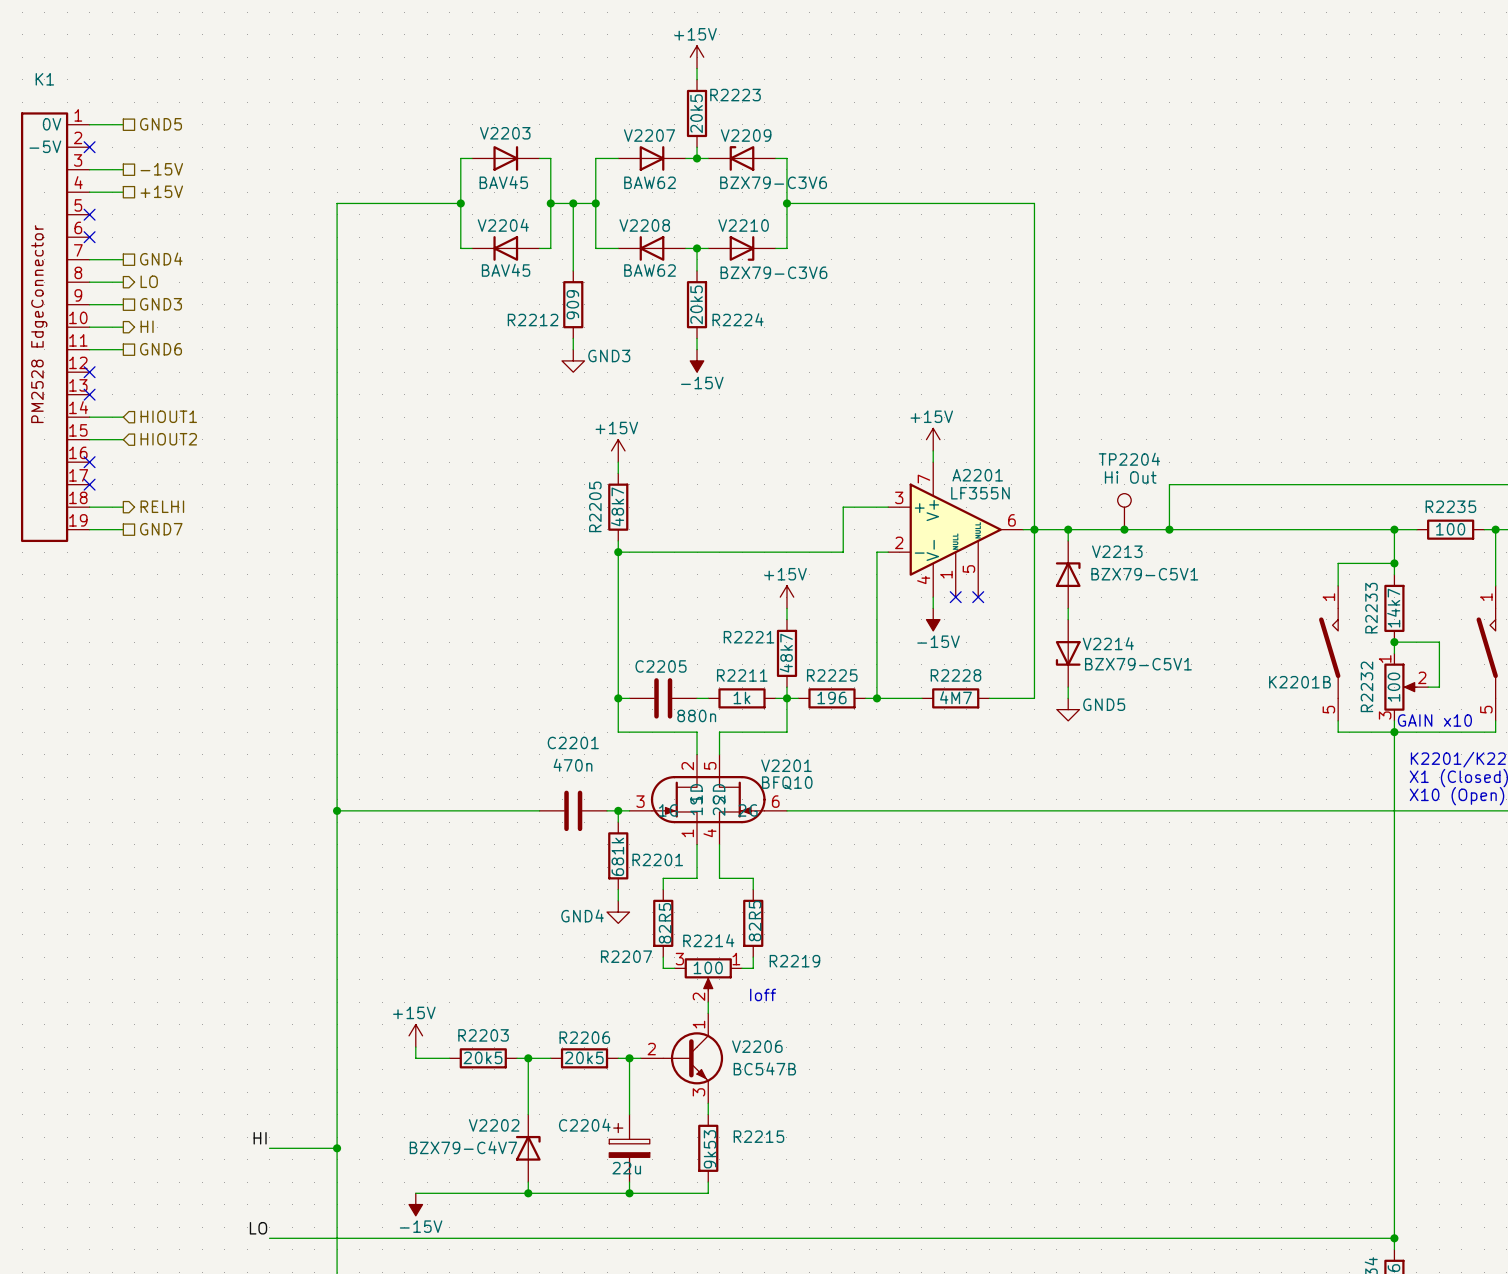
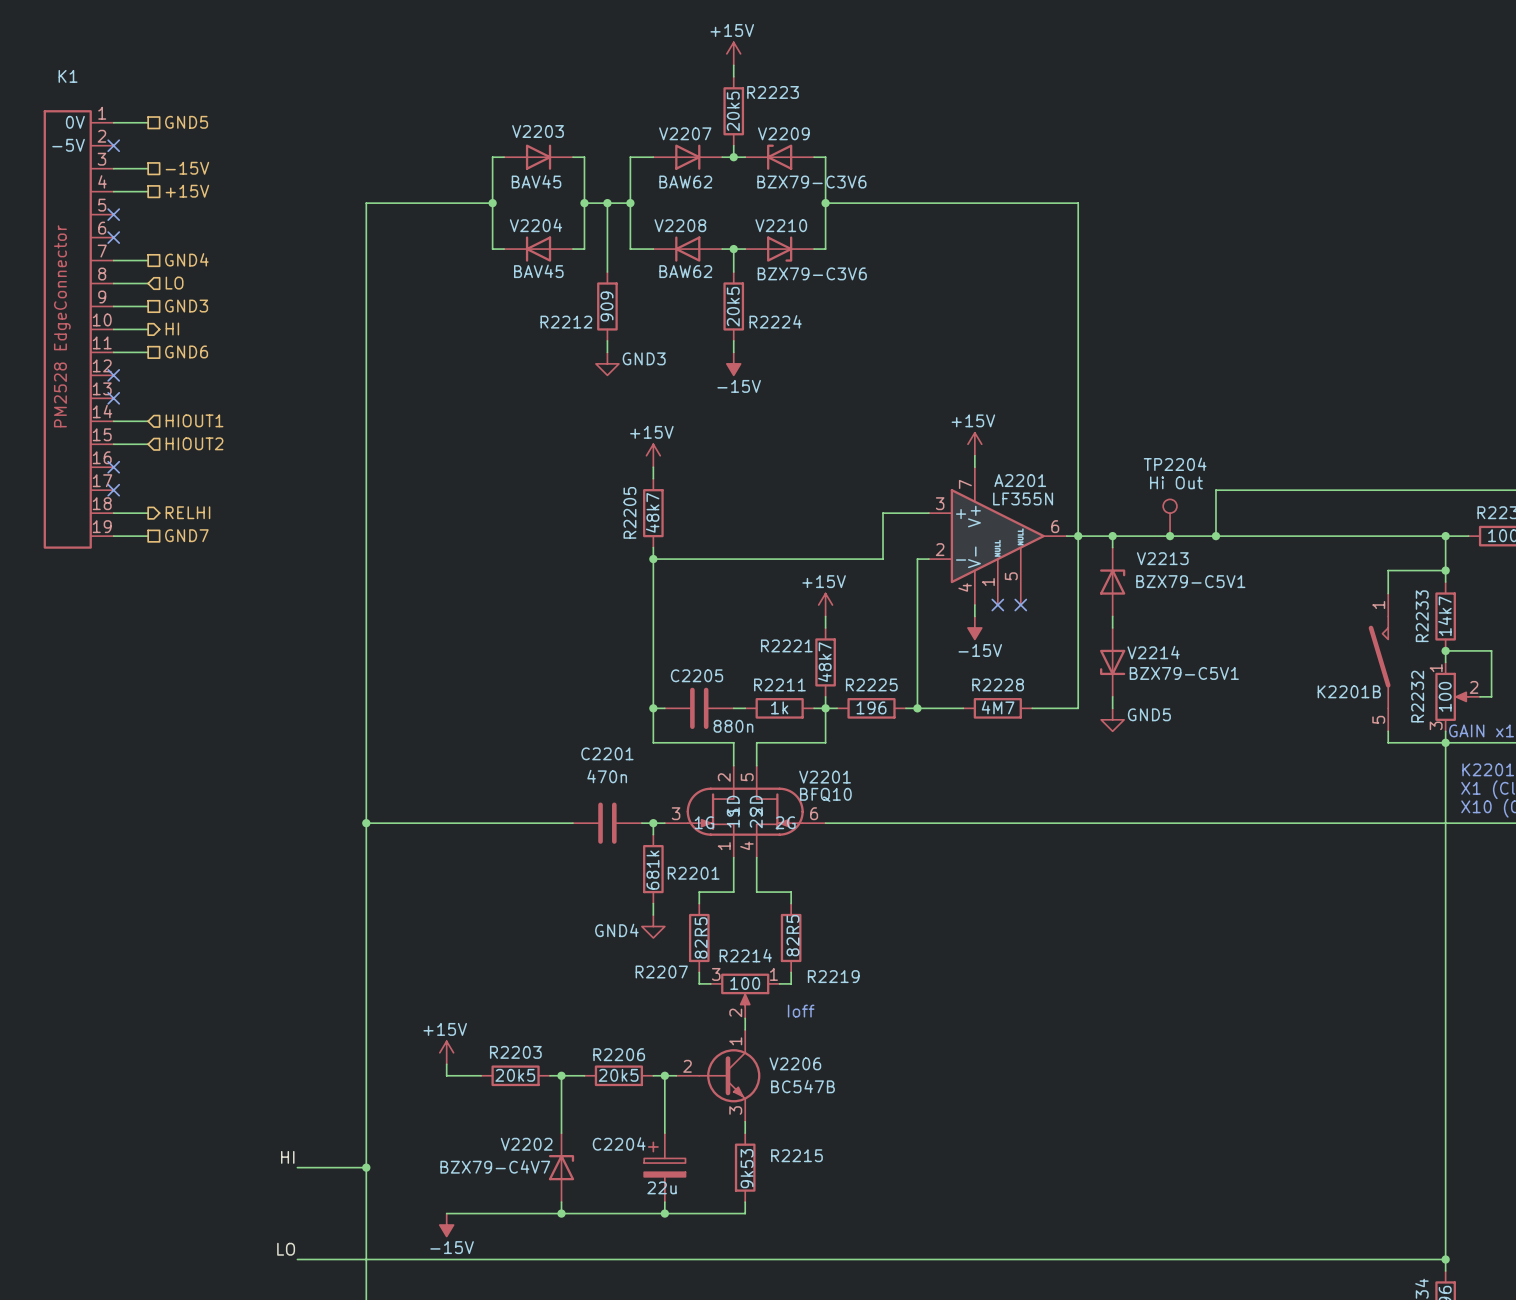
hierarchical label shape: output (149, 281) -> input (174, 283)

